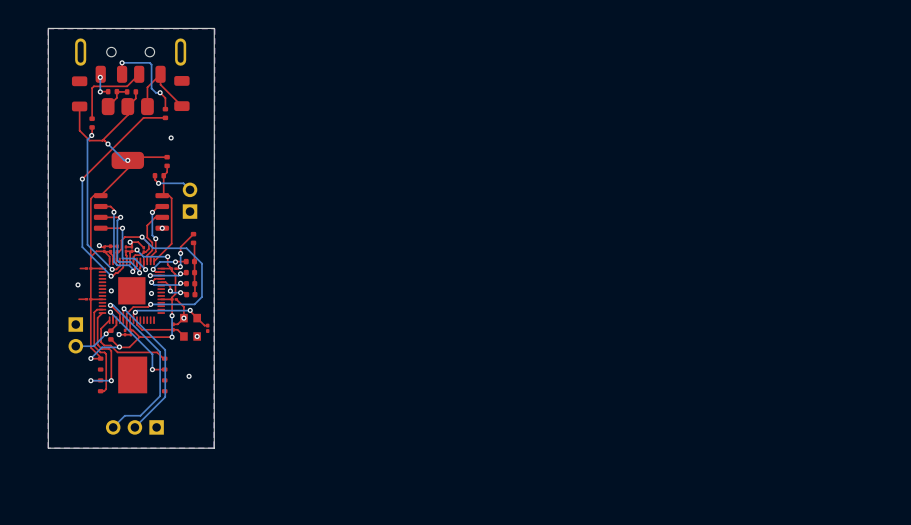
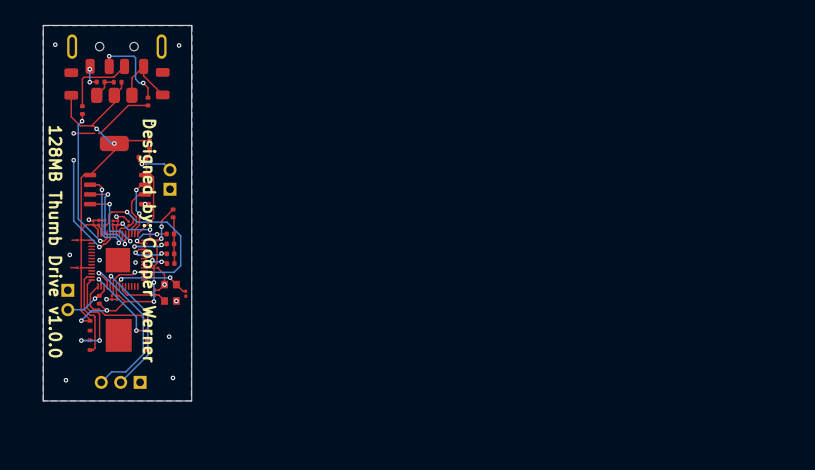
via: none -> (55, 44)
via: none -> (179, 45)
via: none -> (73, 133)
top track: none -> (94, 133) (73, 133)
top track: (112, 149) (82, 179) -> (100, 133) (98, 133)
text: none -> Designed by: Cooper Werner (147, 241)
text: none -> 128MB Thumb Drive v1.0.0 (55, 241)
via: none -> (172, 377)
via: none -> (65, 380)

